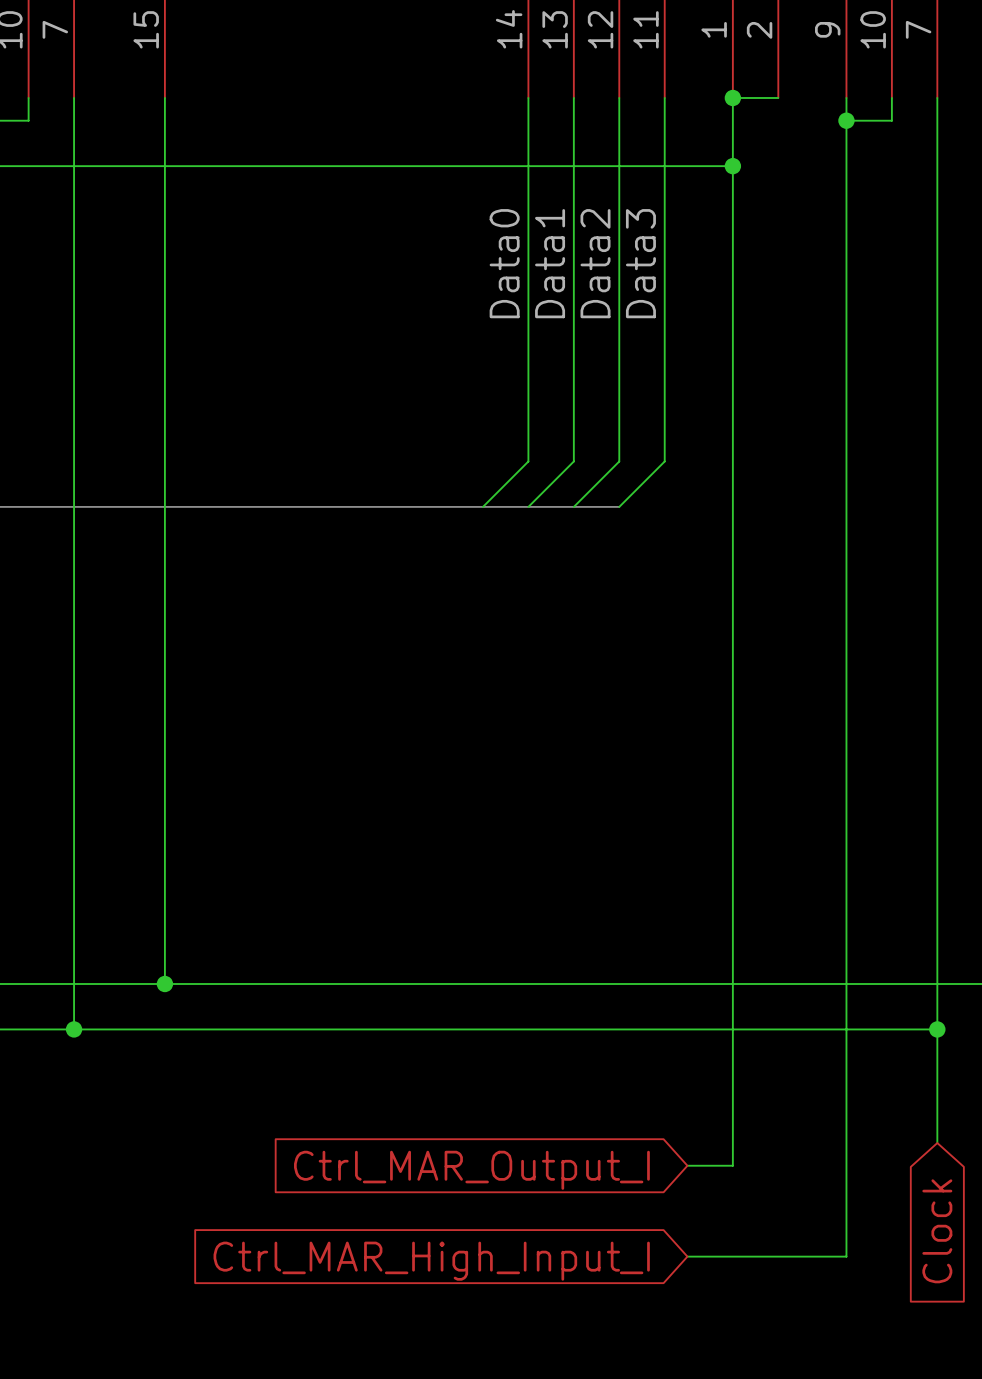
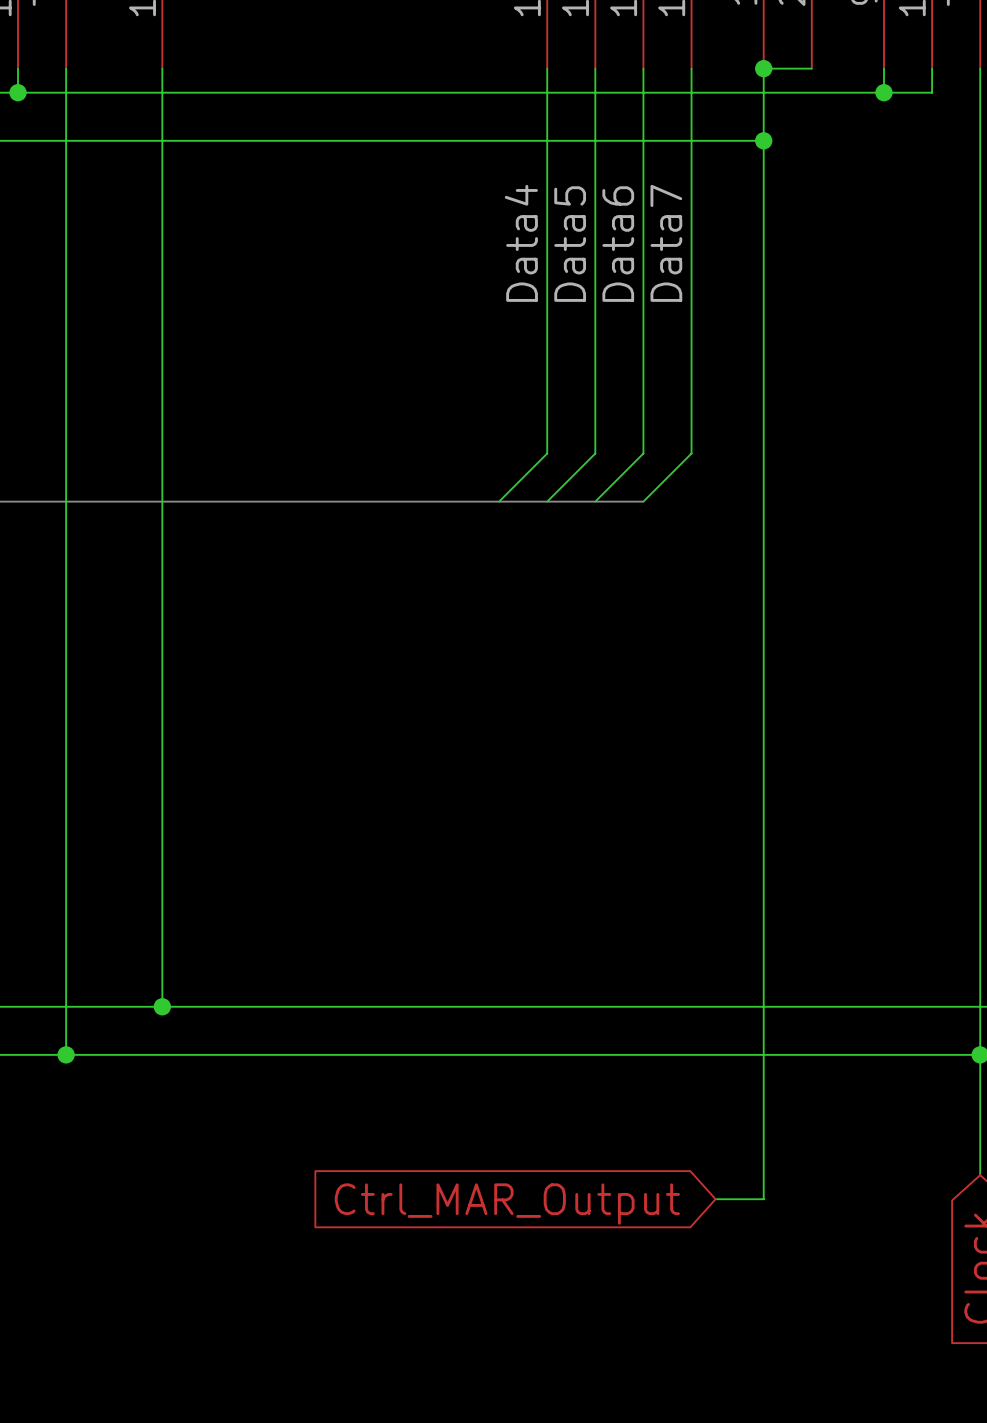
junction: none -> (18, 92)
wire: (846, 120) (846, 1256) (687, 1256) -> (883, 92) (18, 92)
label: Data0 (504, 263) -> Data4 (521, 243)
label: Data1 (550, 263) -> Data5 (570, 244)
label: Data2 (595, 263) -> Data6 (618, 244)
label: Data3 (640, 263) -> Data7 (666, 243)
global label: Ctrl_MAR_Output_I (471, 1170) -> Ctrl_MAR_Output (507, 1204)
global label: Ctrl_MAR_High_Input_I (431, 1261) -> none

